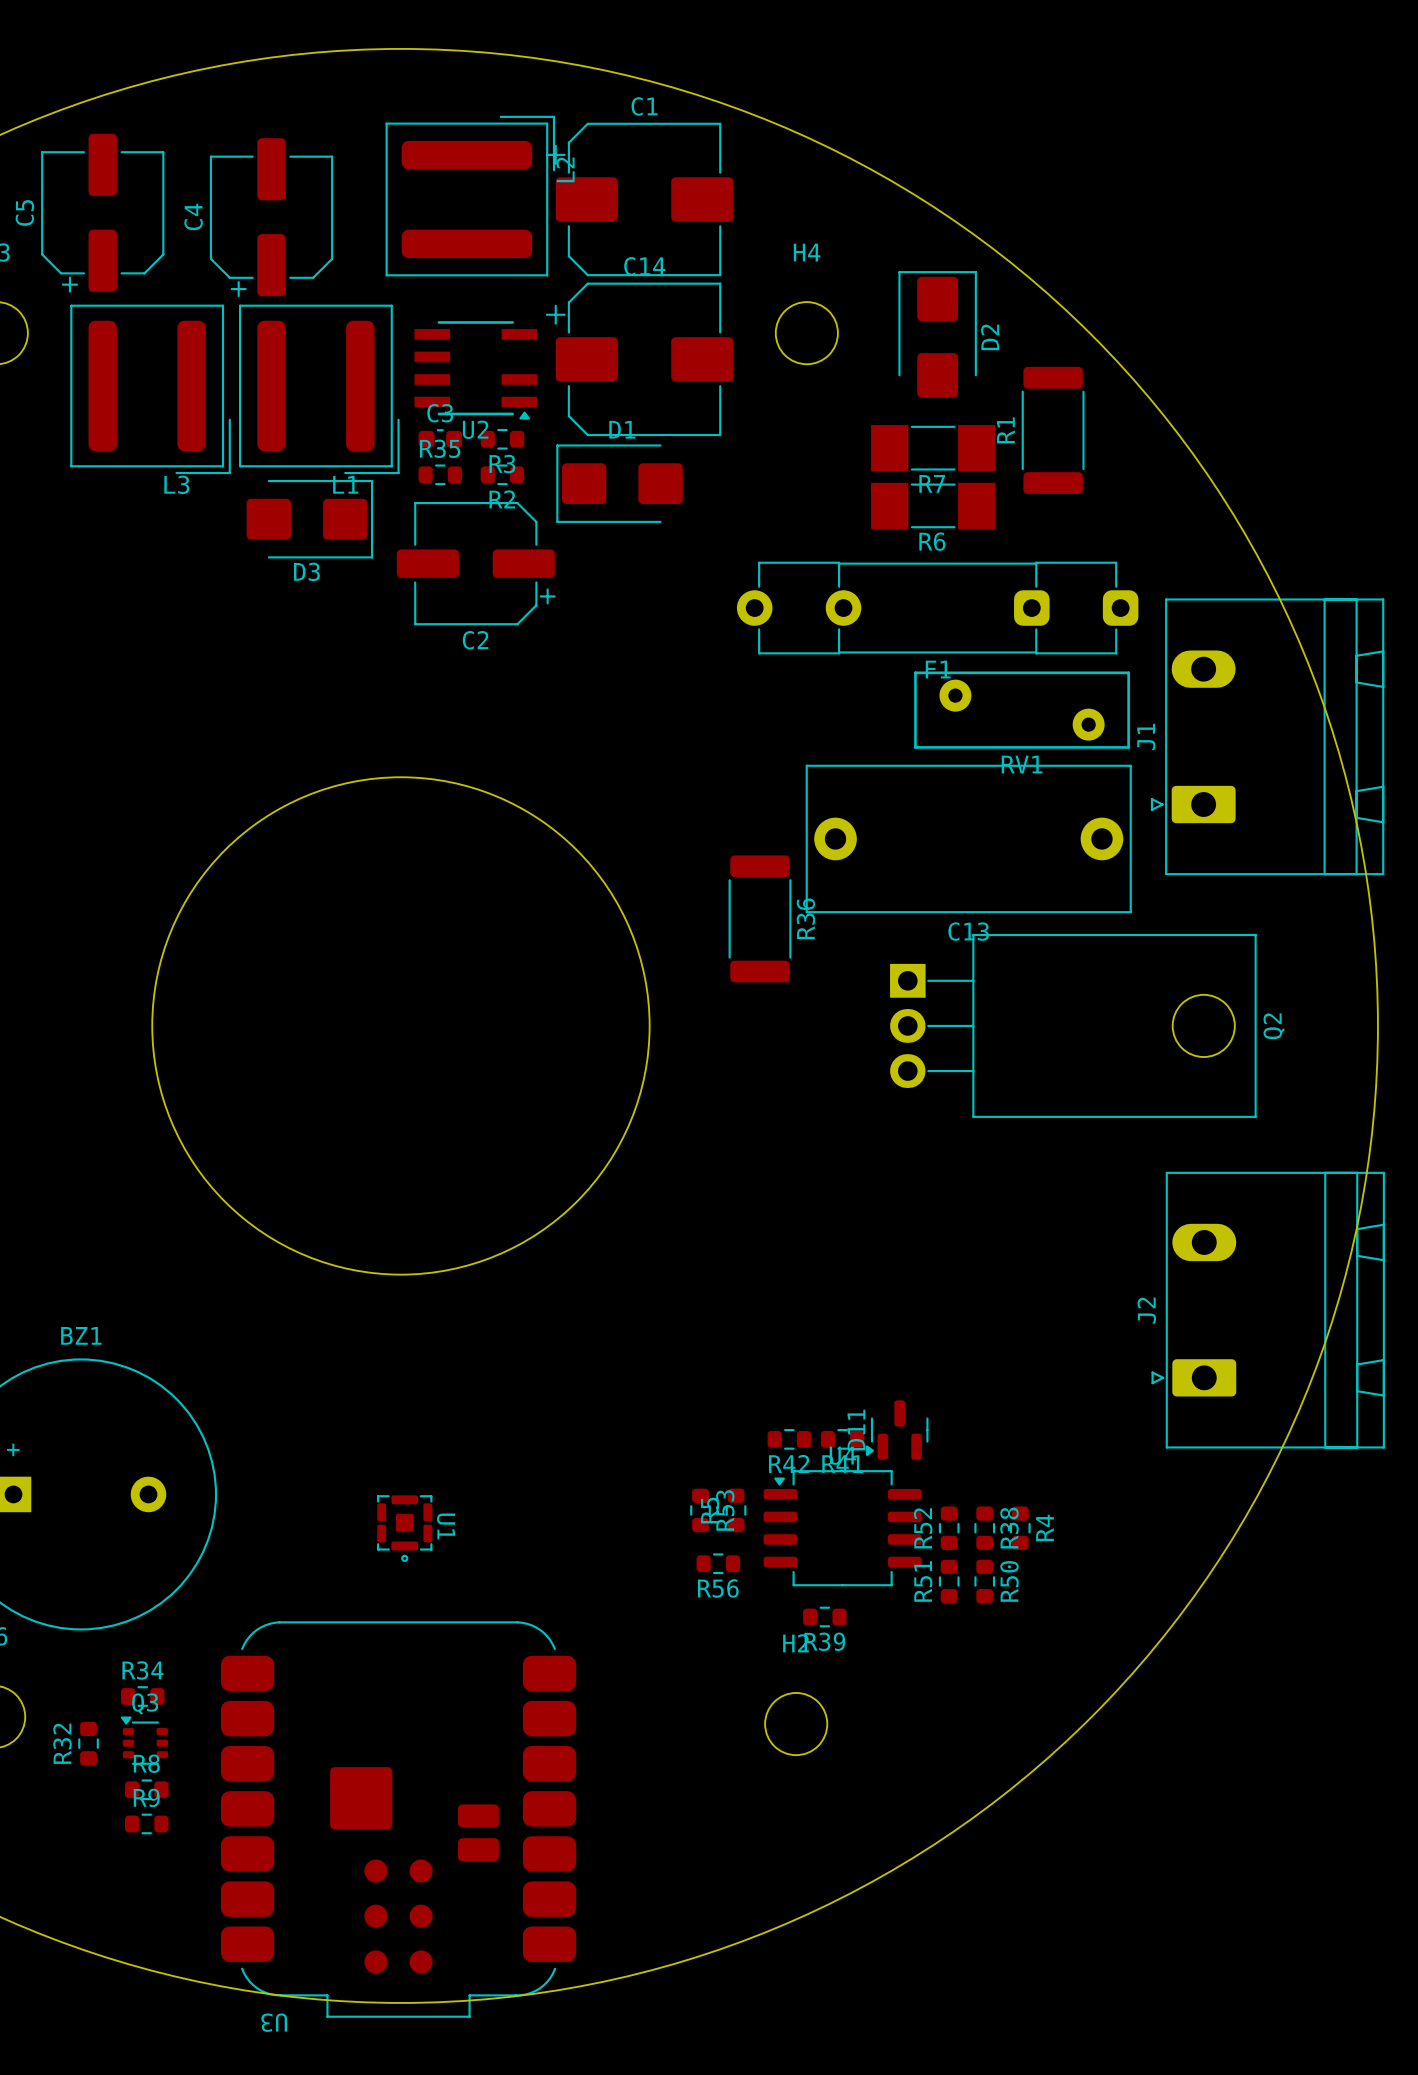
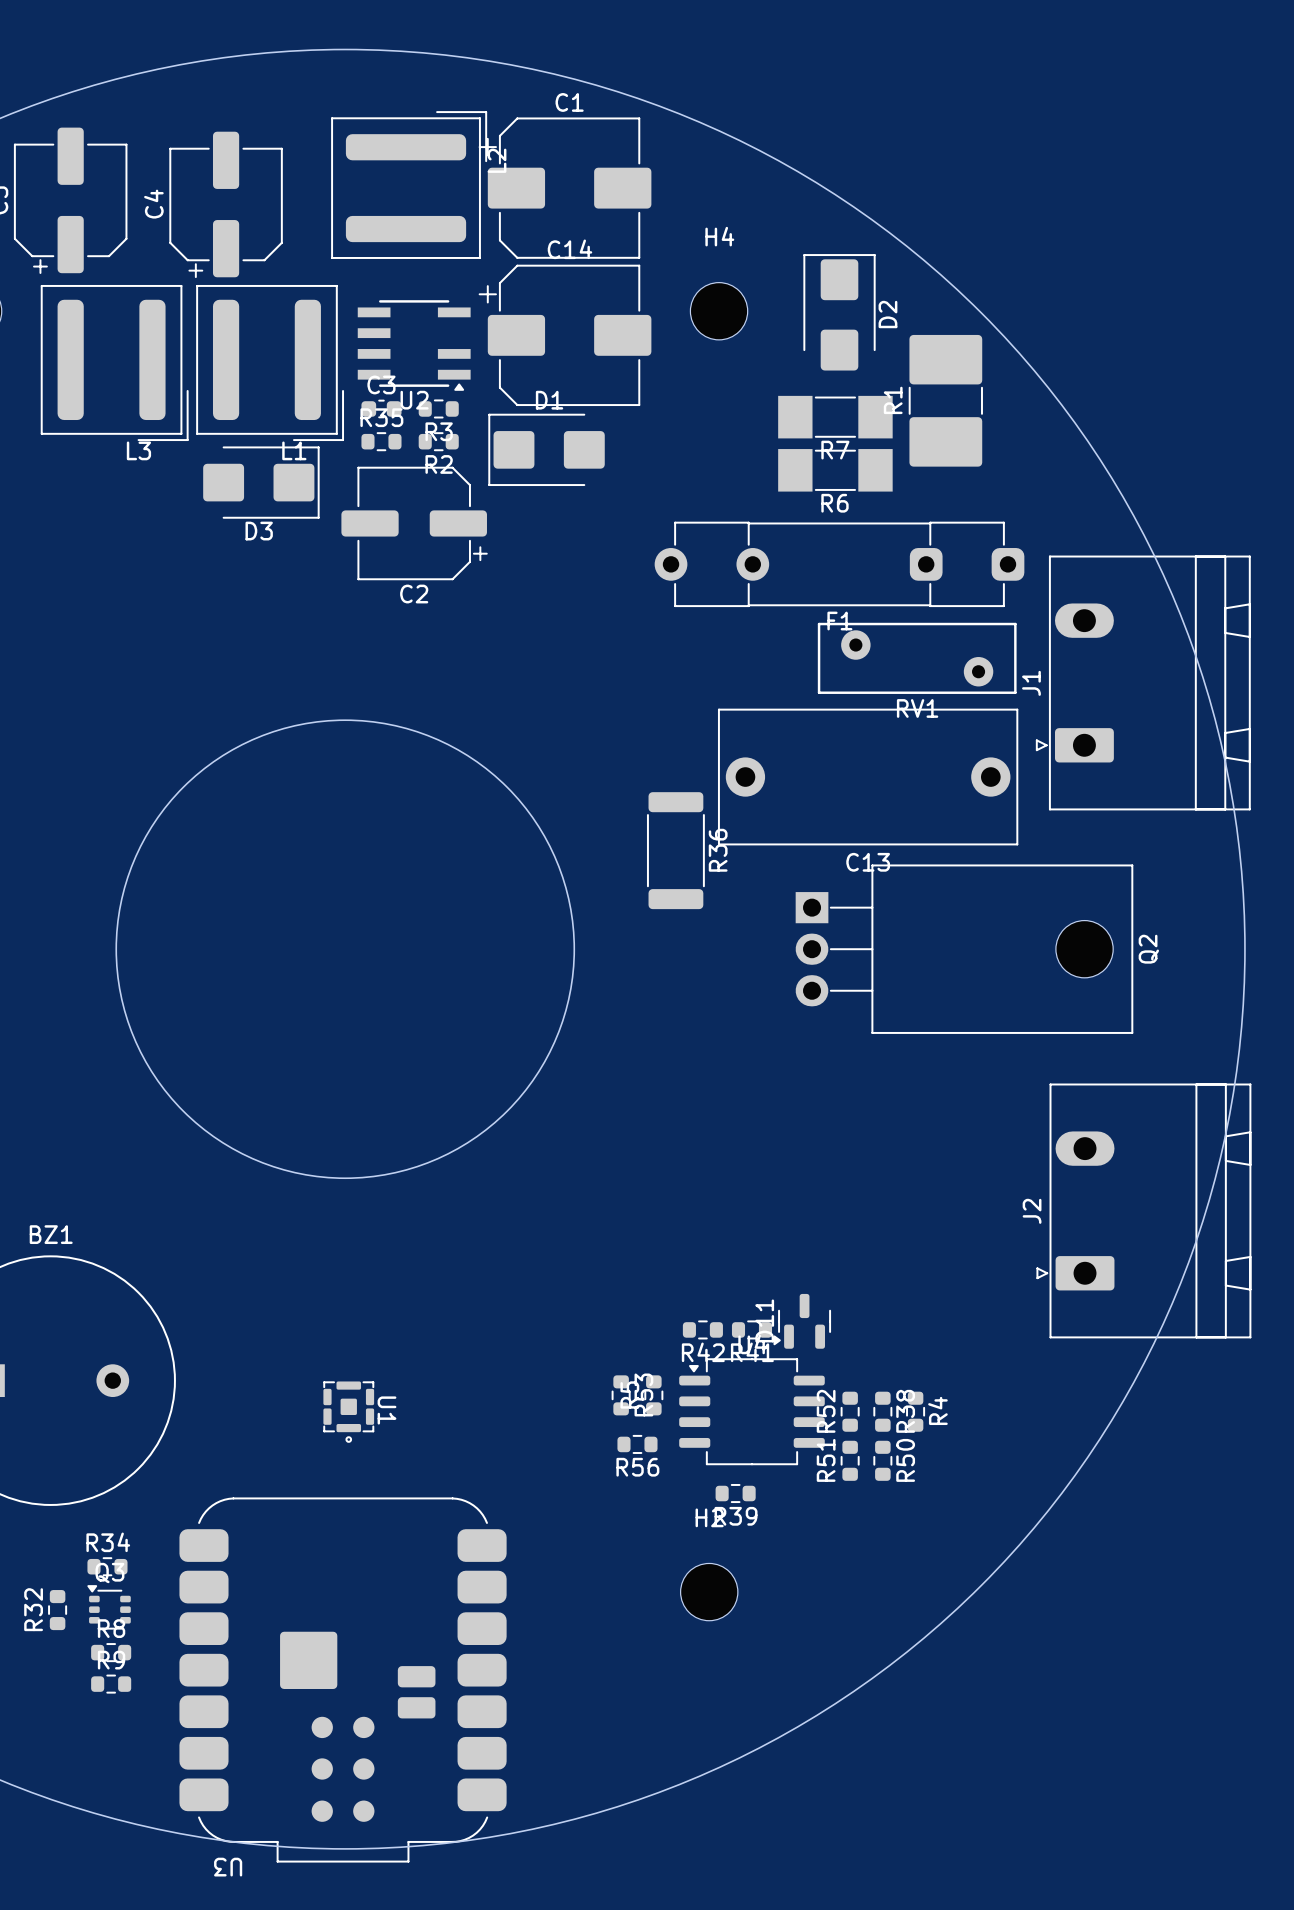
R1 footprint: [1021, 366, 1085, 494] -> [908, 334, 983, 467]

